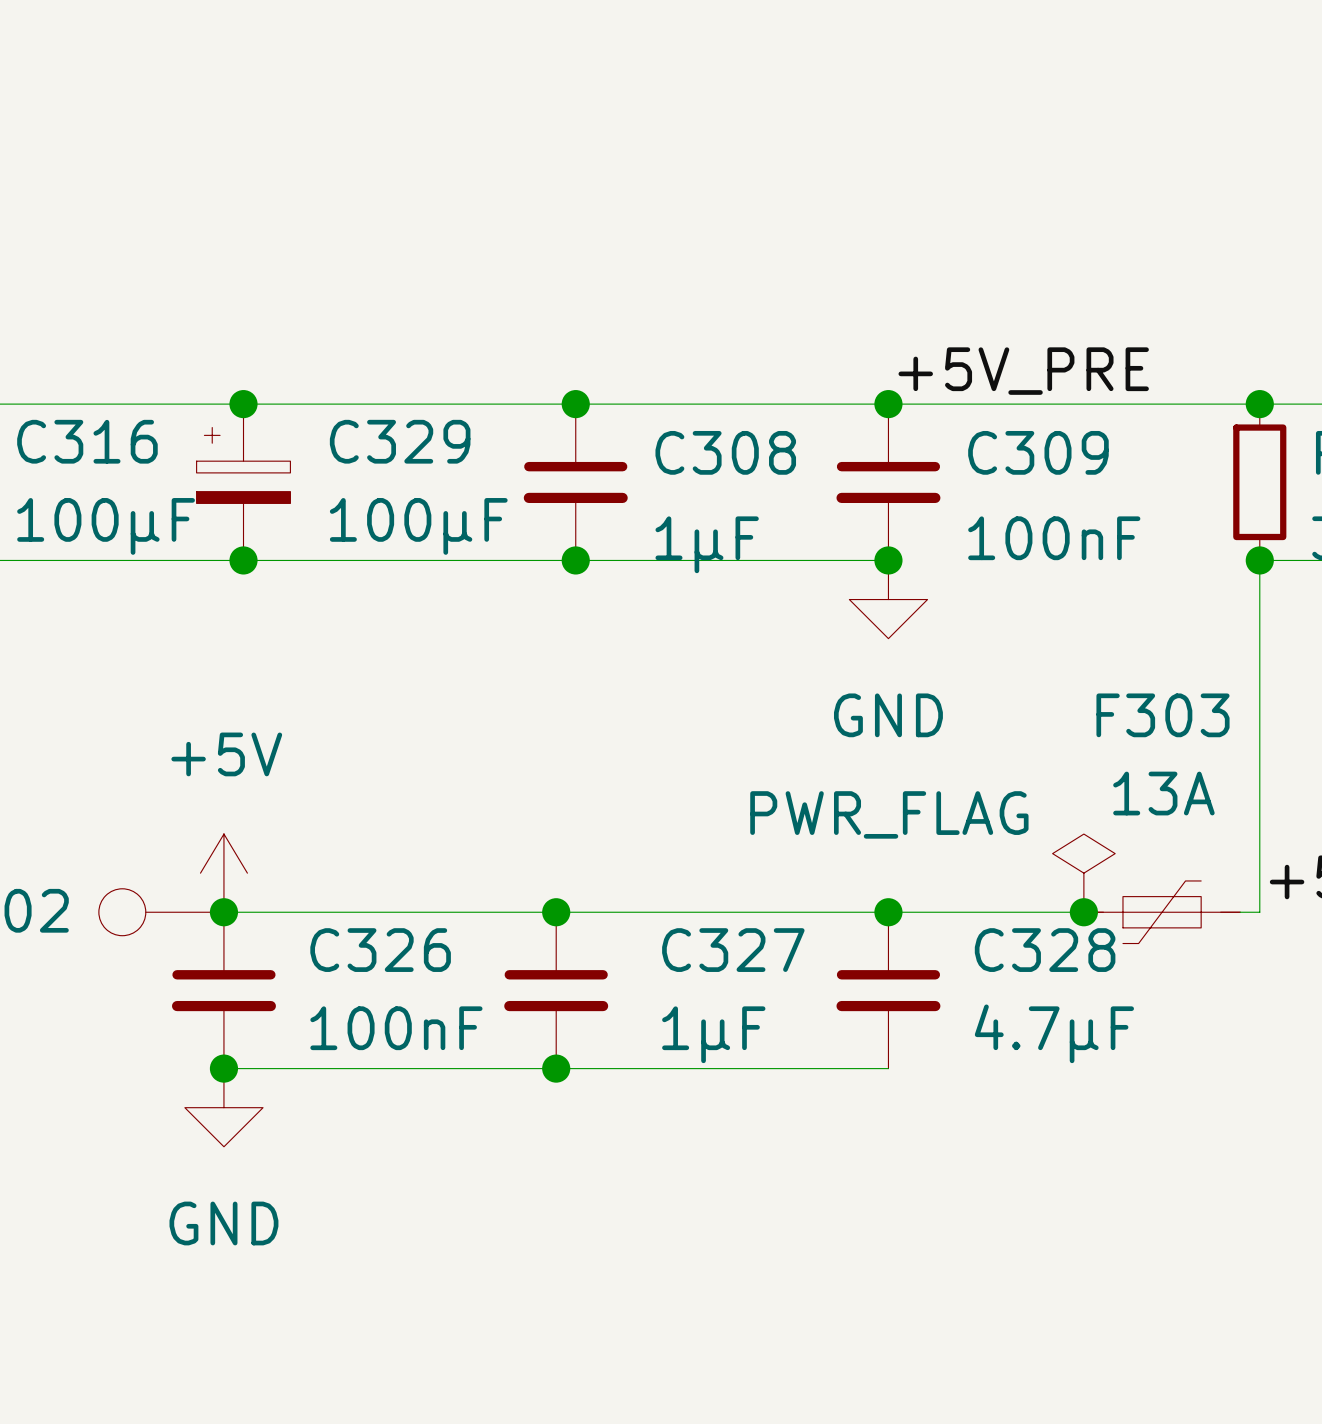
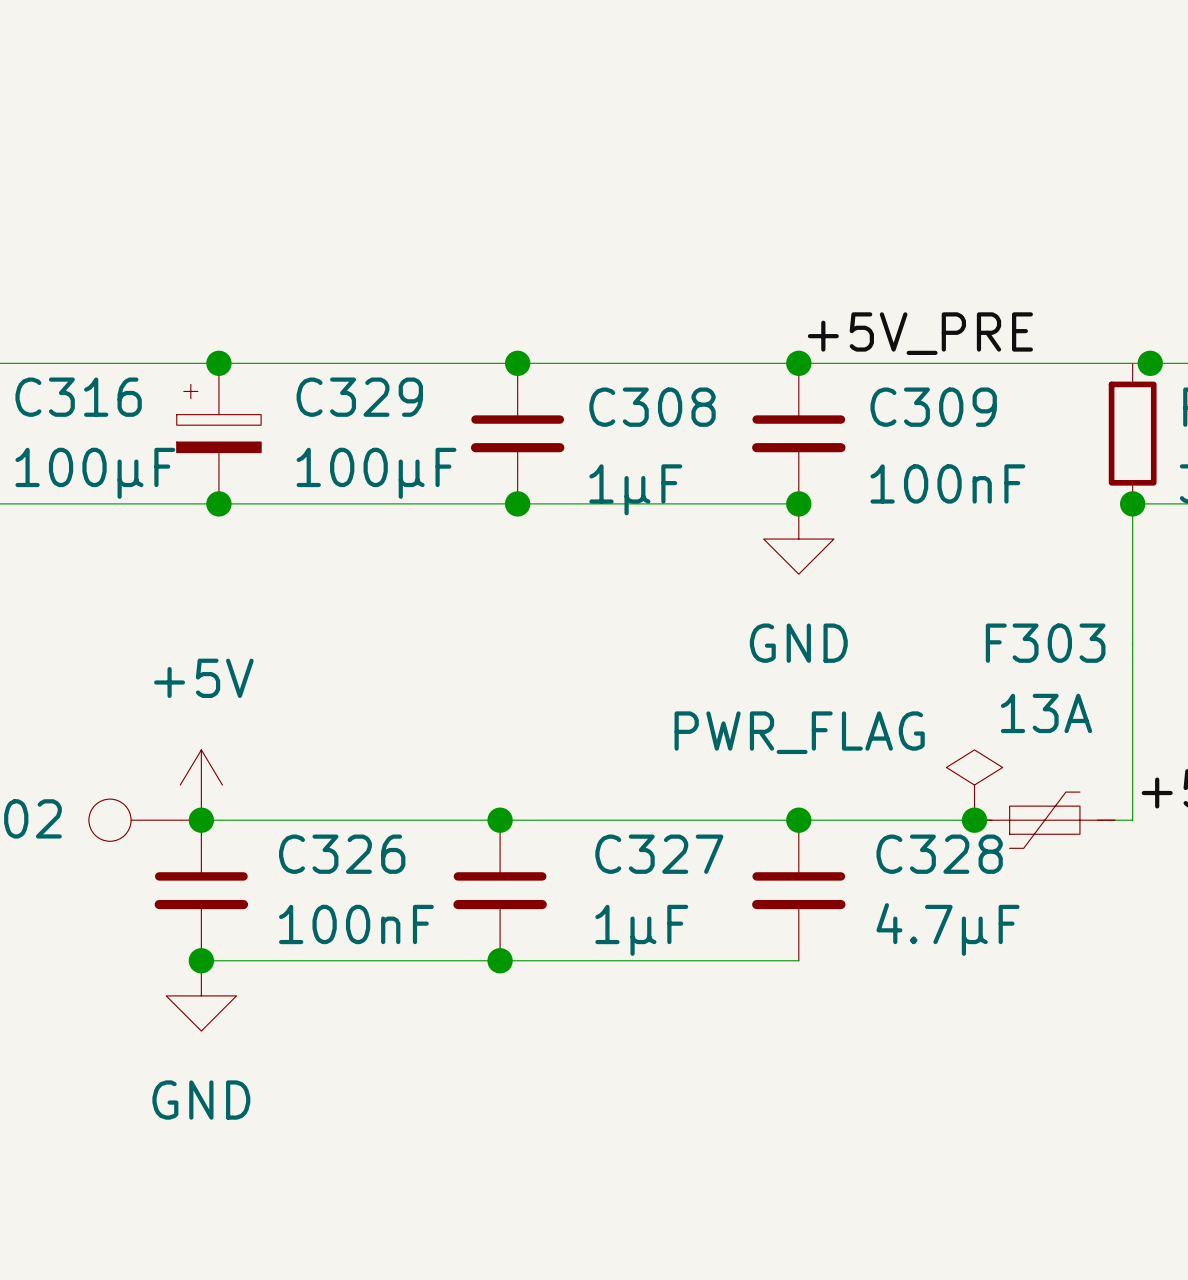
junction position: (1259, 404) -> (1150, 363)

